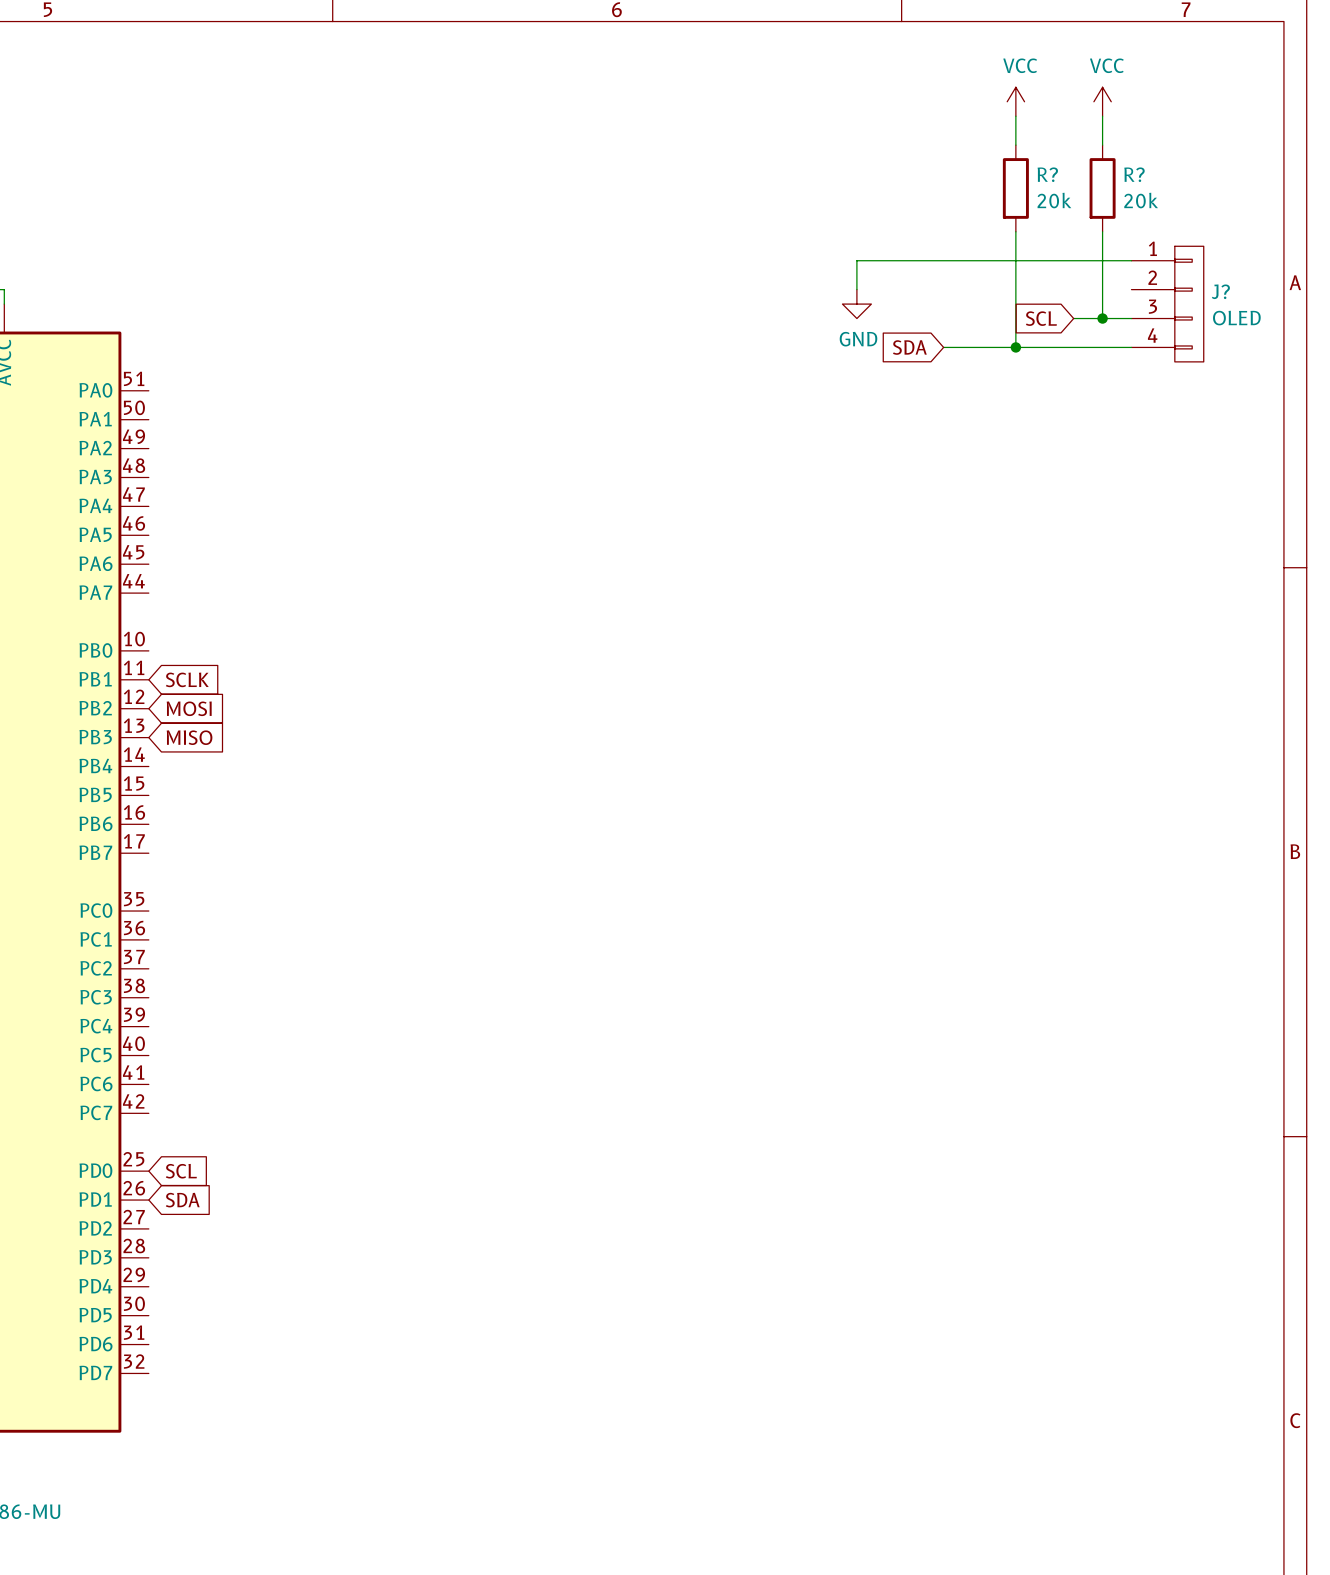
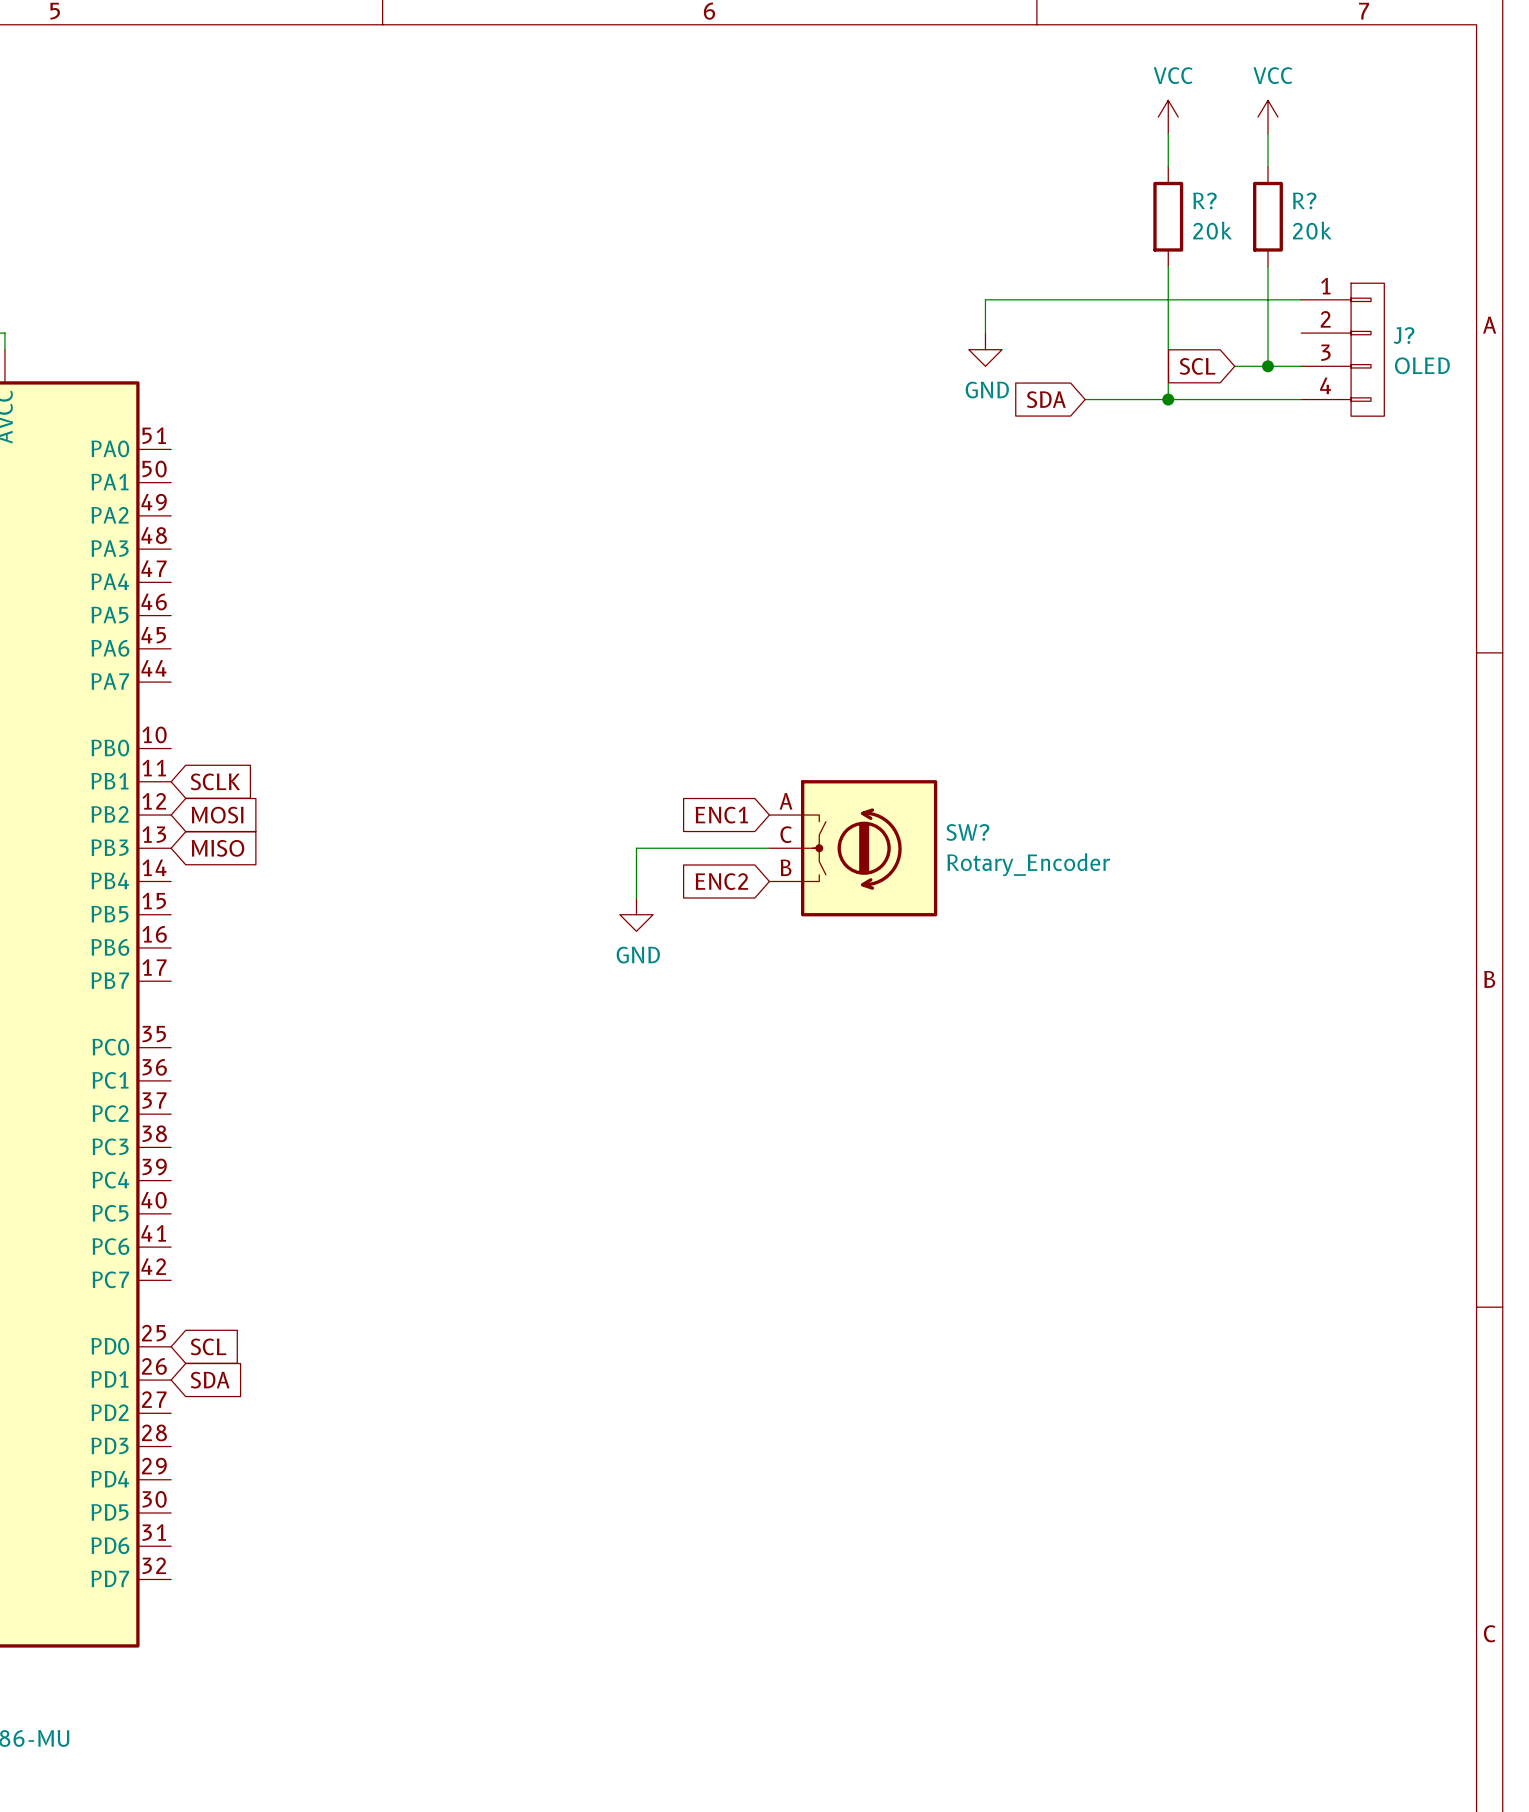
global label: none -> ENC1 (721, 815)
wire: none -> (769, 848) (636, 848) (636, 898)
SW?: none -> Rotary_Encoder (853, 848)
global label: none -> ENC2 (721, 881)
power symbol: none -> GND (636, 914)

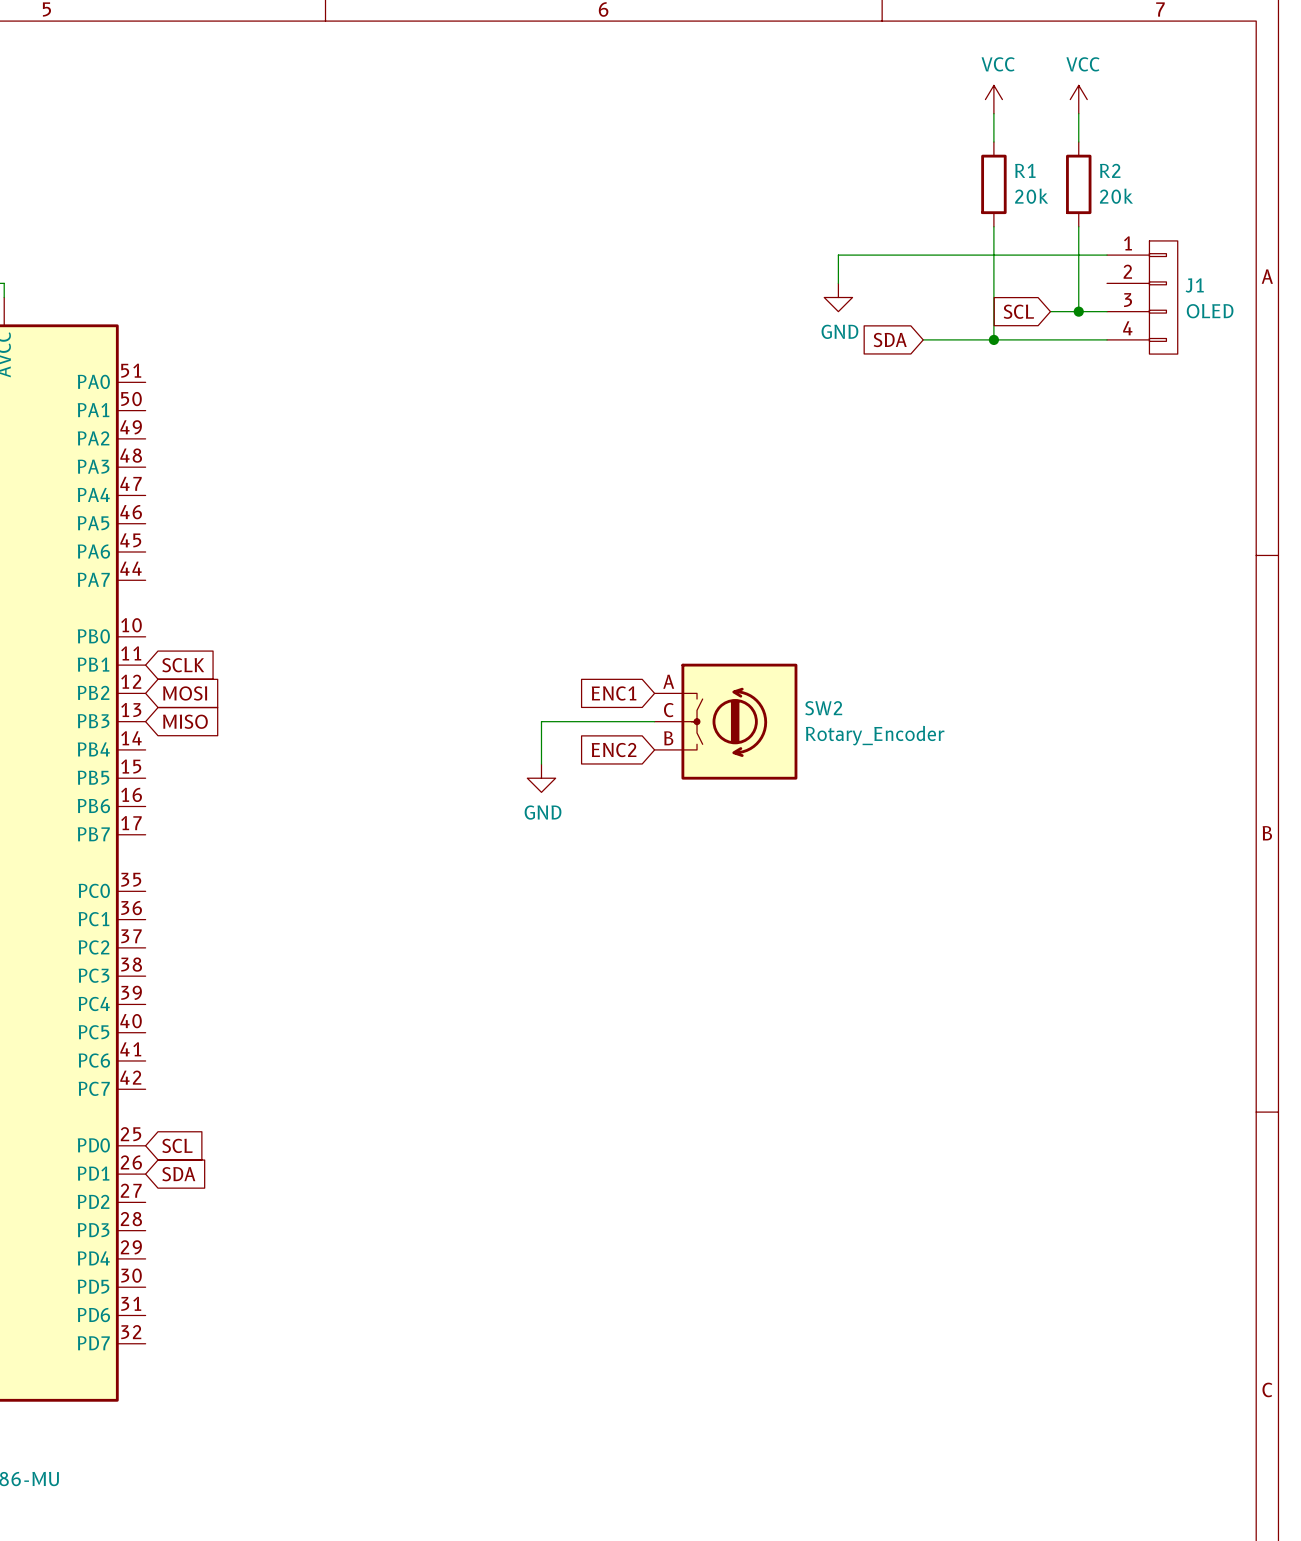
R? name: R? (1204, 200) -> R1 (1025, 170)
R? name: R? (1304, 200) -> R2 (1110, 170)
J? name: J? (1404, 335) -> J1 (1194, 285)
SW? name: SW? (967, 832) -> SW2 (823, 708)

